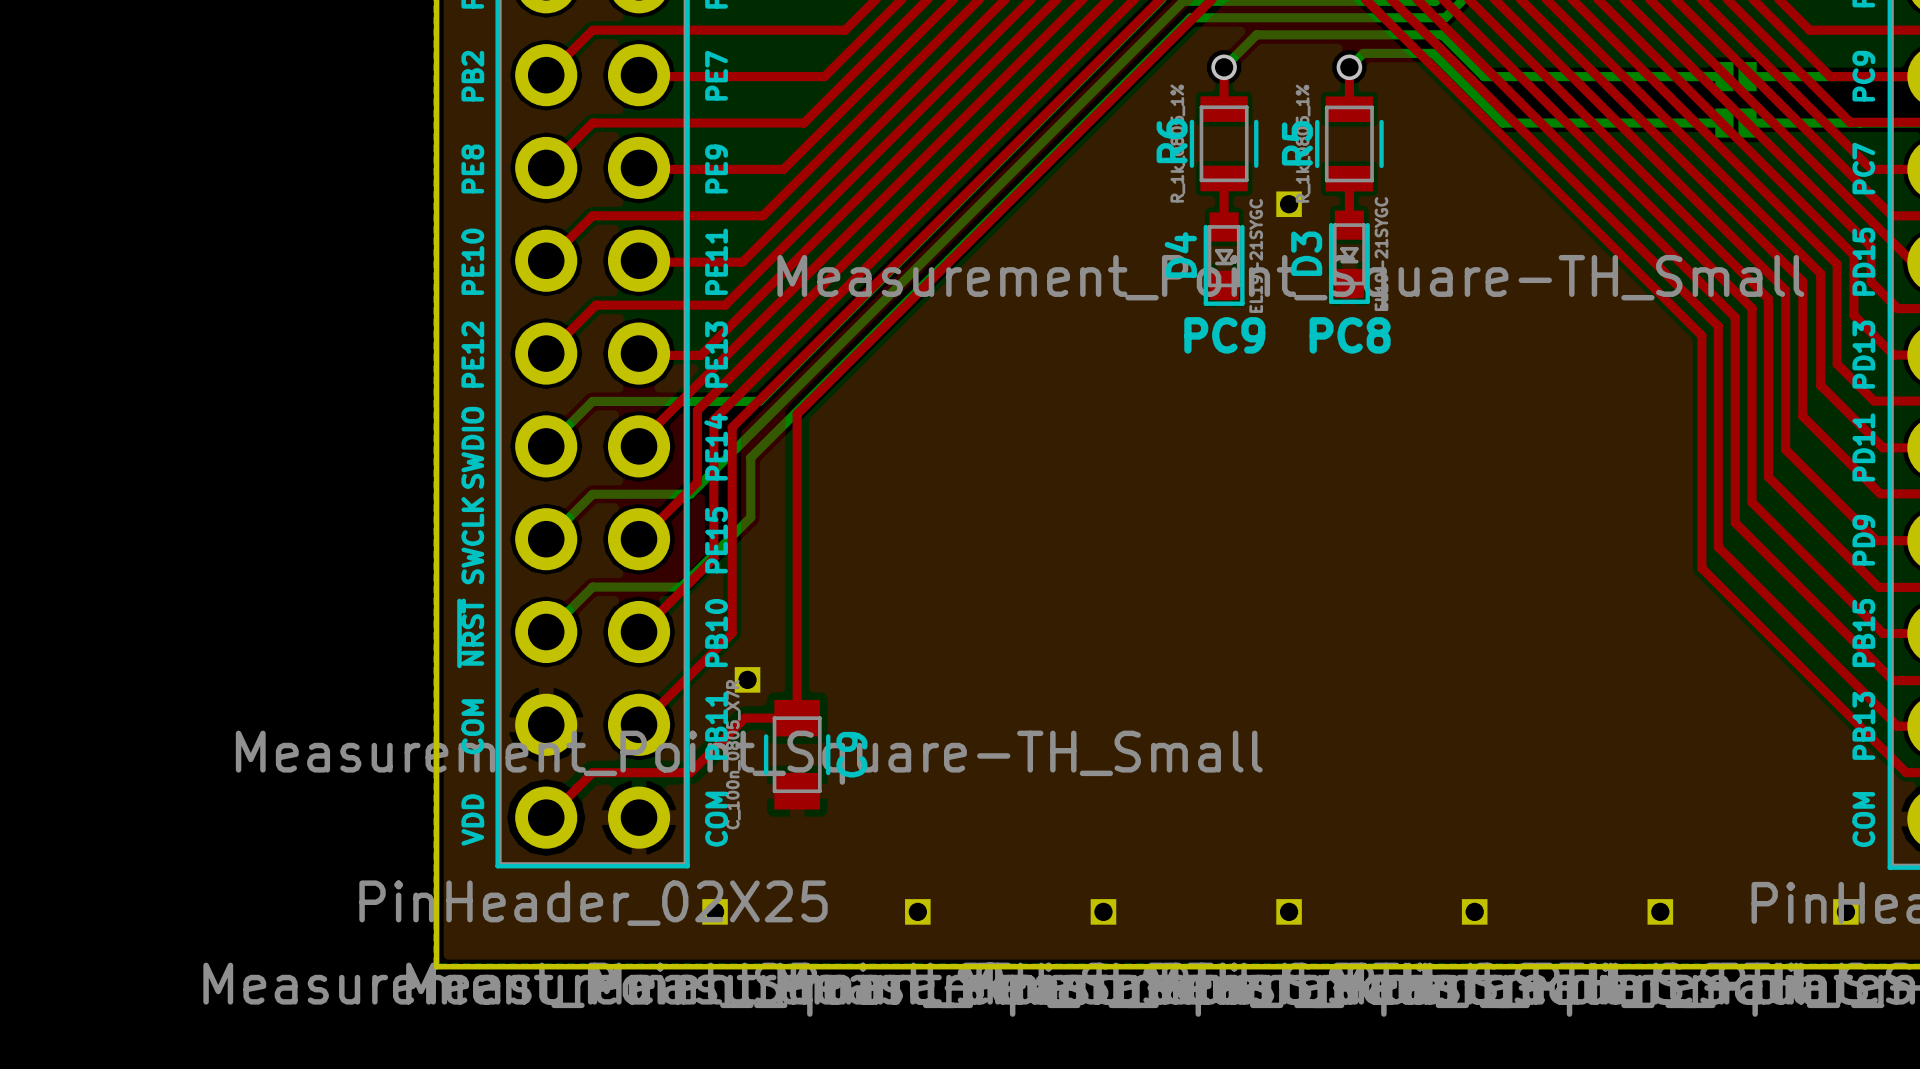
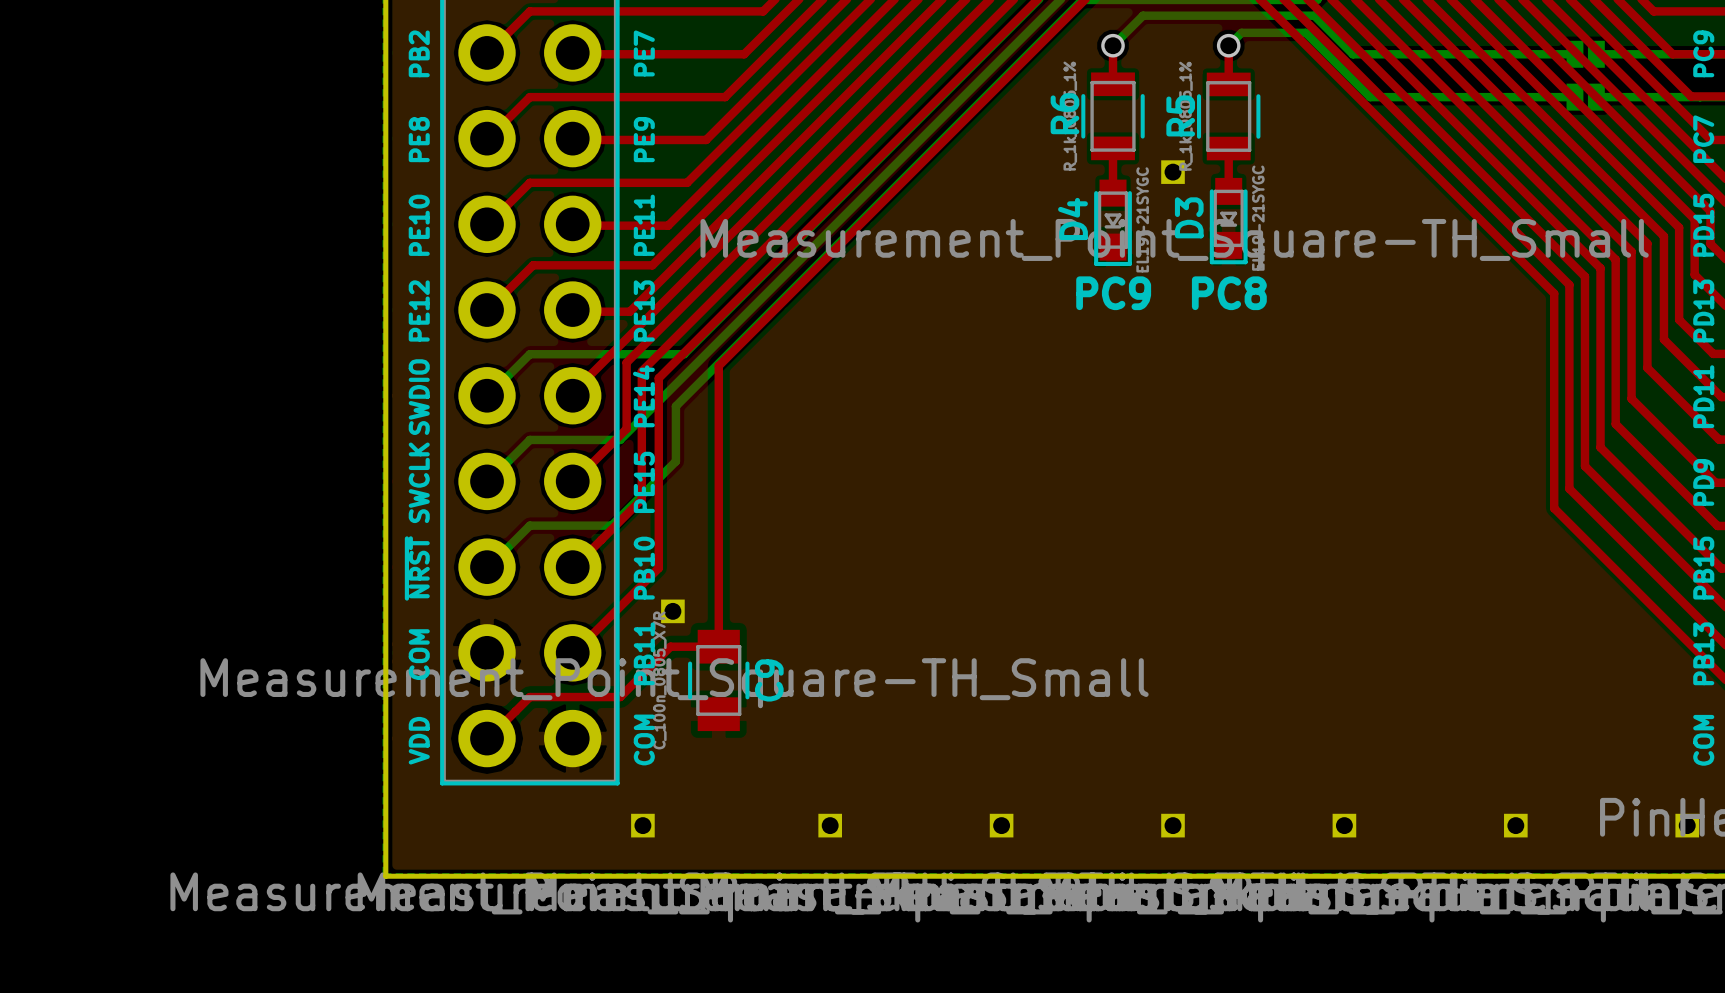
part value: PinHeader_02X25 (593, 903) -> none

